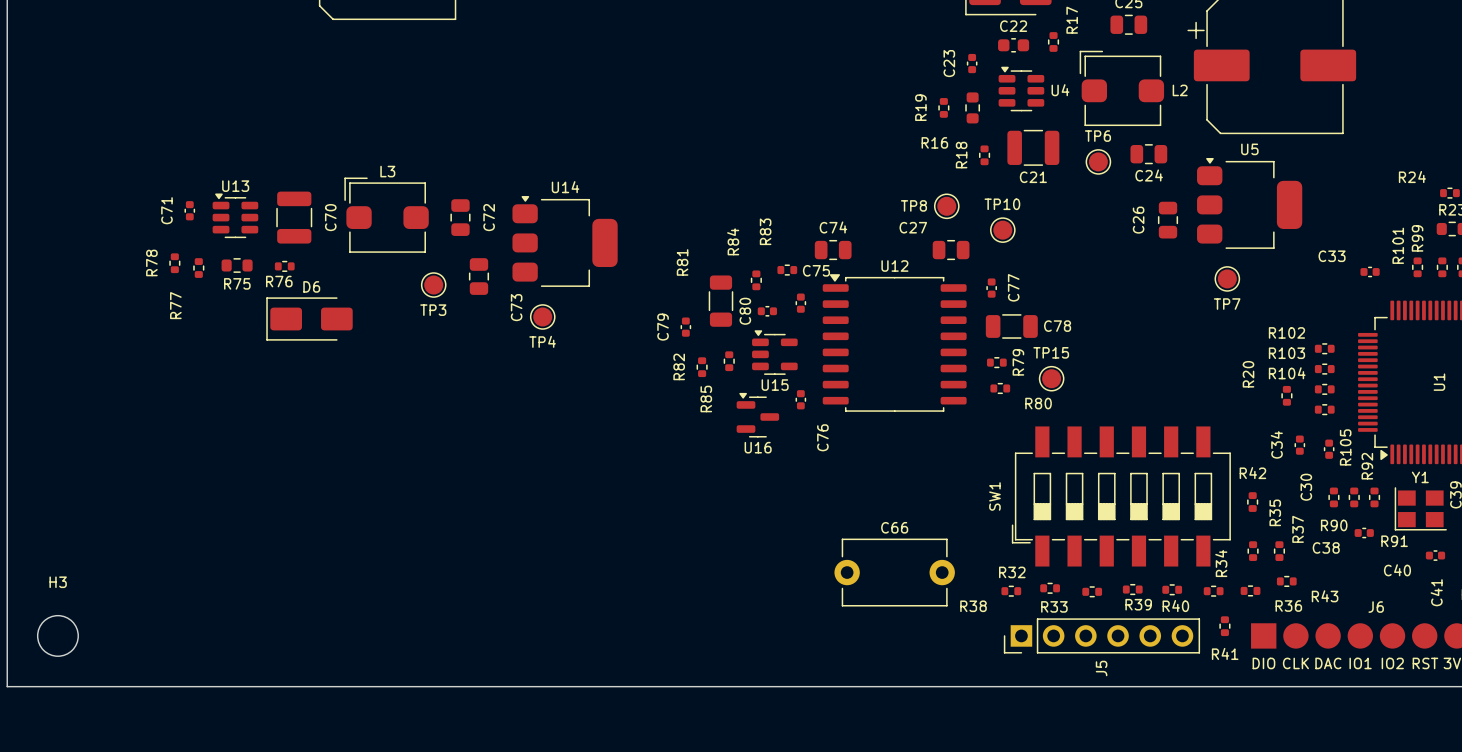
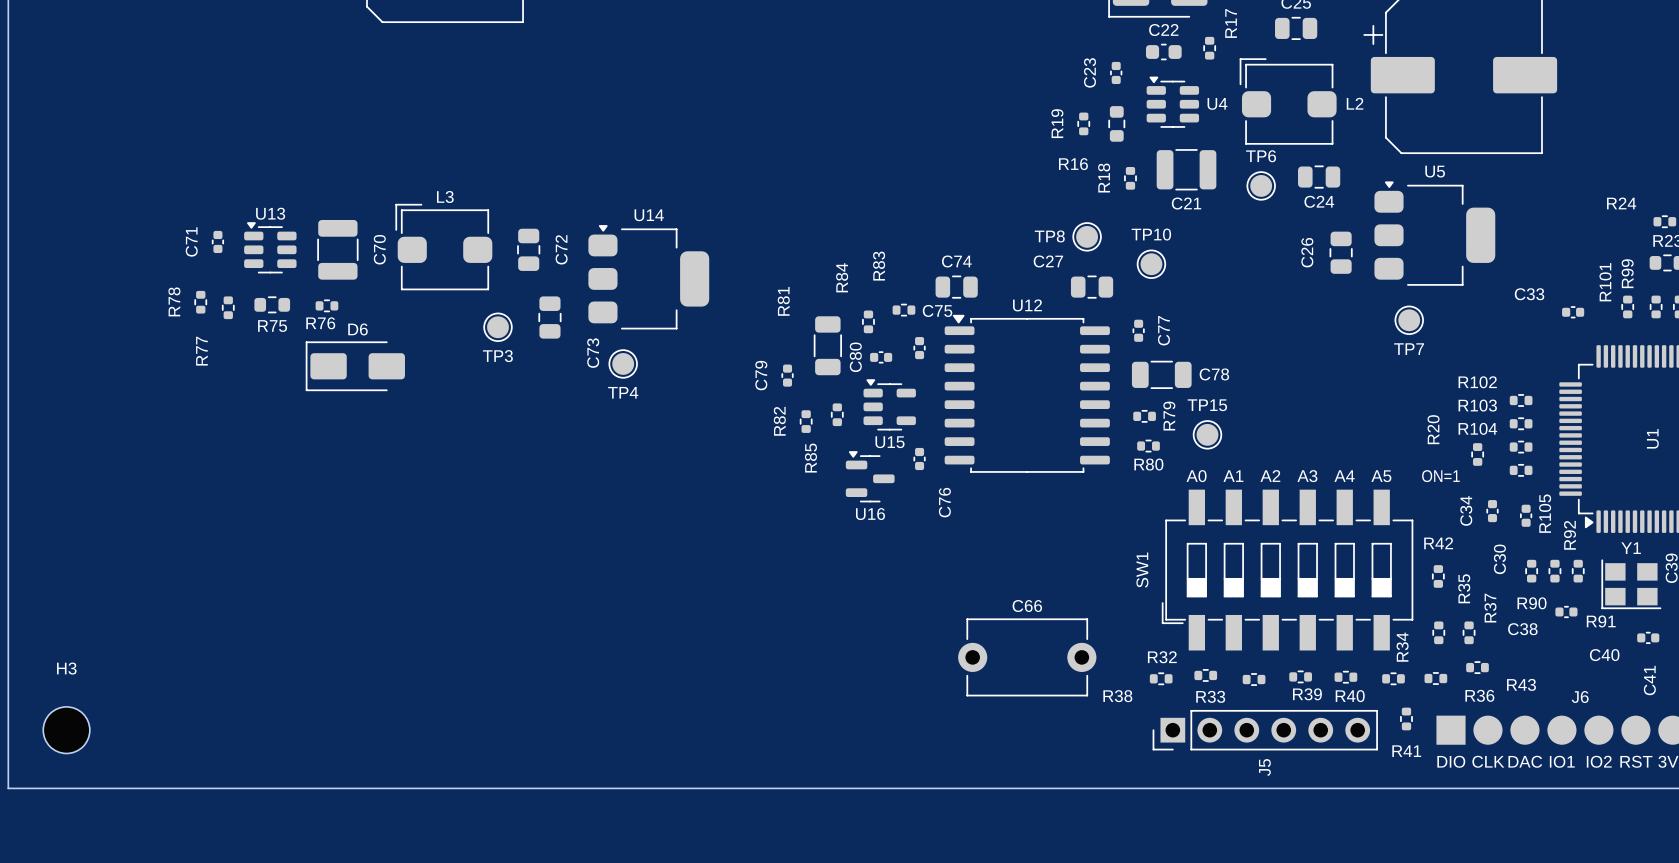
R80 name position: R80 (1038, 403) -> R80 (1148, 464)
text: none -> A0 (1196, 476)
text: none -> A1 (1233, 476)
text: none -> A2 (1270, 476)
text: none -> A3 (1307, 476)
text: none -> A4 (1344, 476)
text: none -> A5 (1381, 476)
text: none -> ON=1 (1440, 476)

